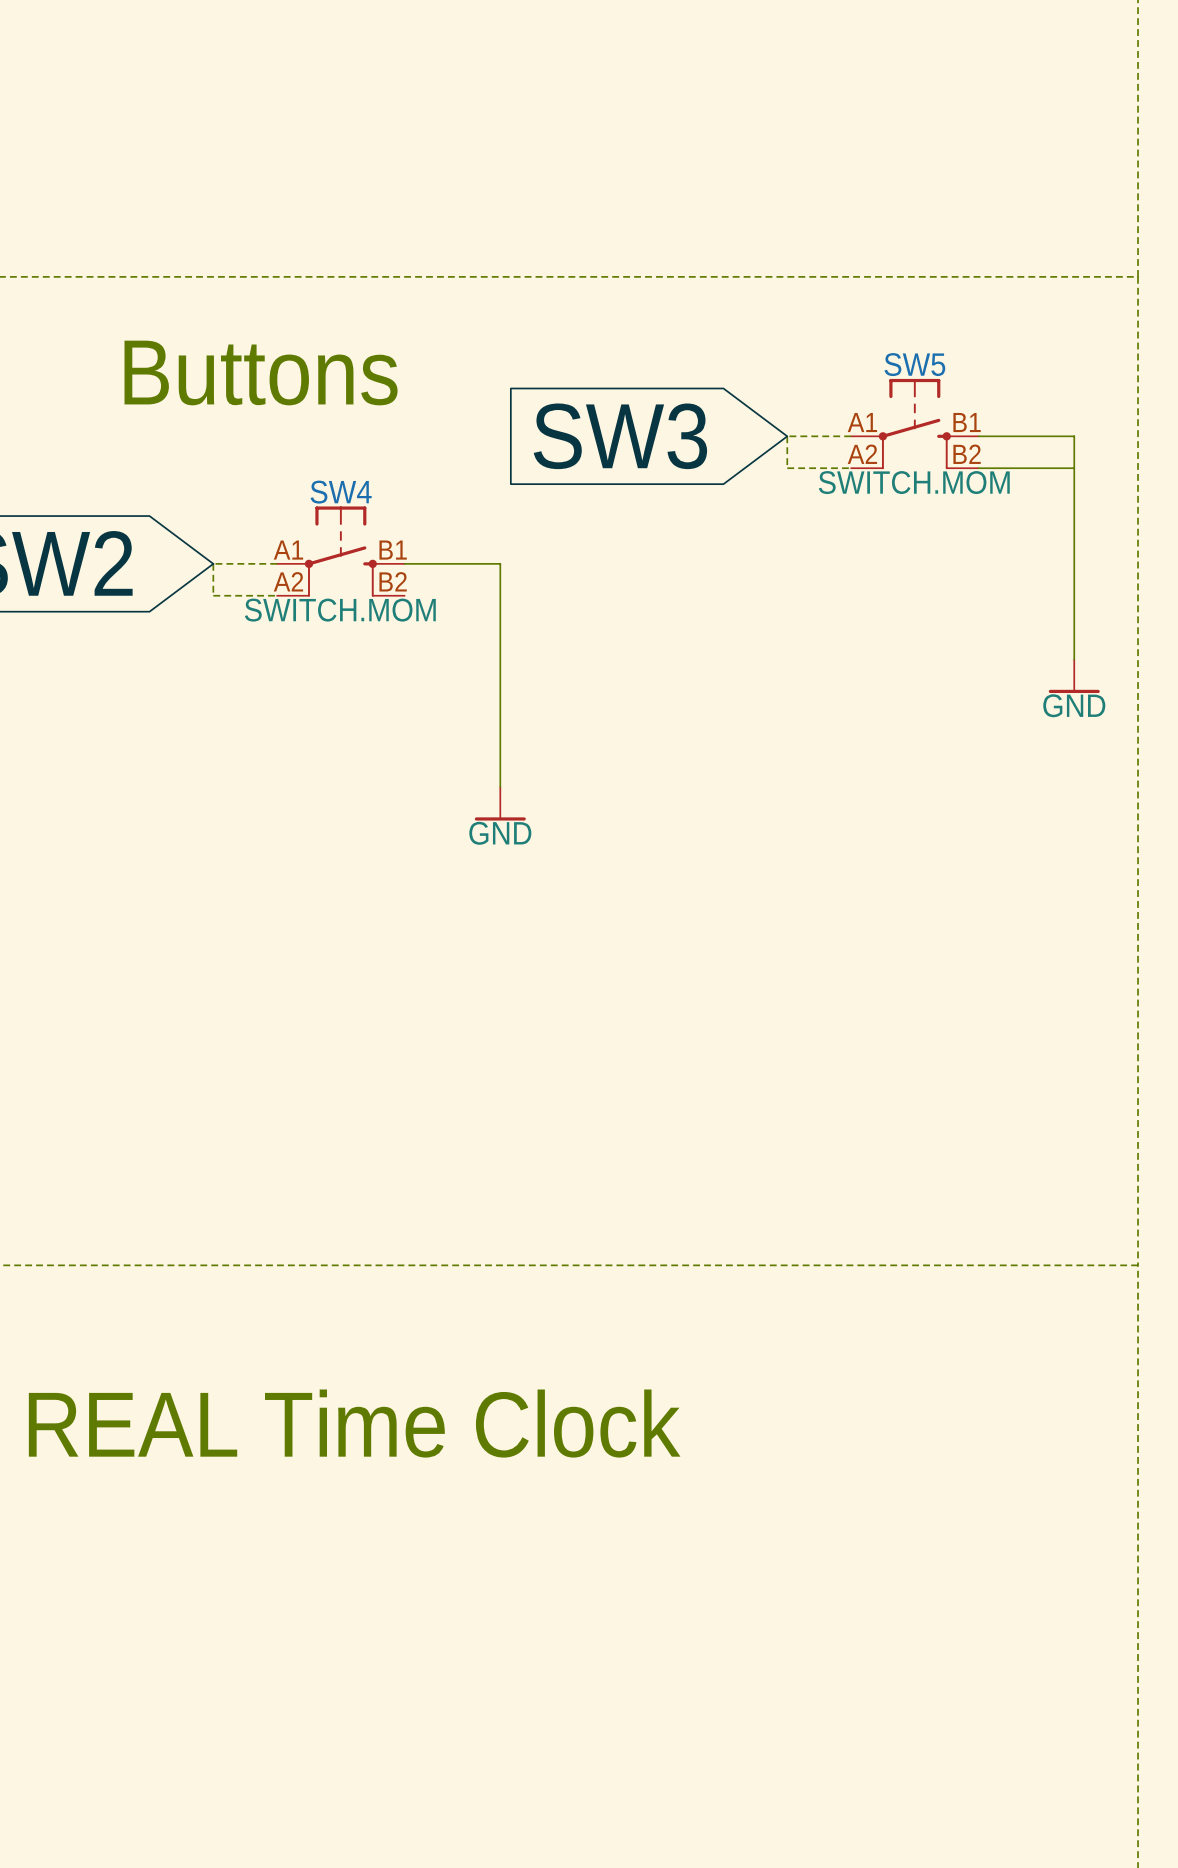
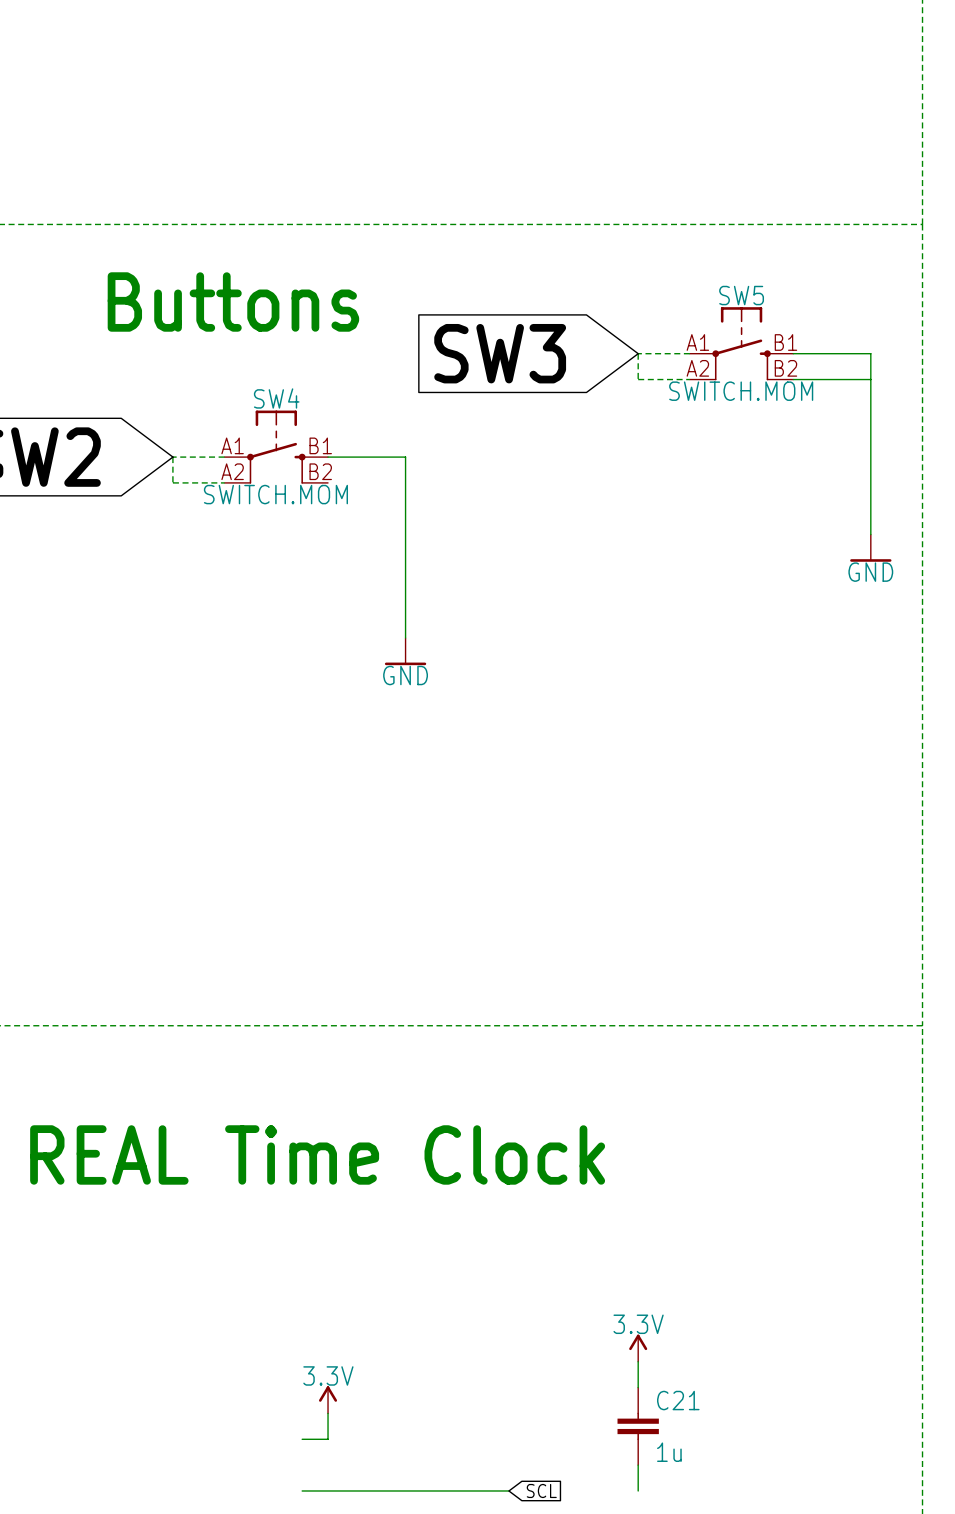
power symbol: none -> 3.3V (638, 1348)
wire: none -> (638, 1361) (638, 1387)
power symbol: none -> 3.3V (328, 1399)
wire: none -> (328, 1413) (328, 1439) (302, 1439)
C21: none -> 1u (638, 1426)
wire: none -> (638, 1465) (638, 1490)
wire: none -> (302, 1490) (508, 1490)
global label: none -> SCL (541, 1490)

